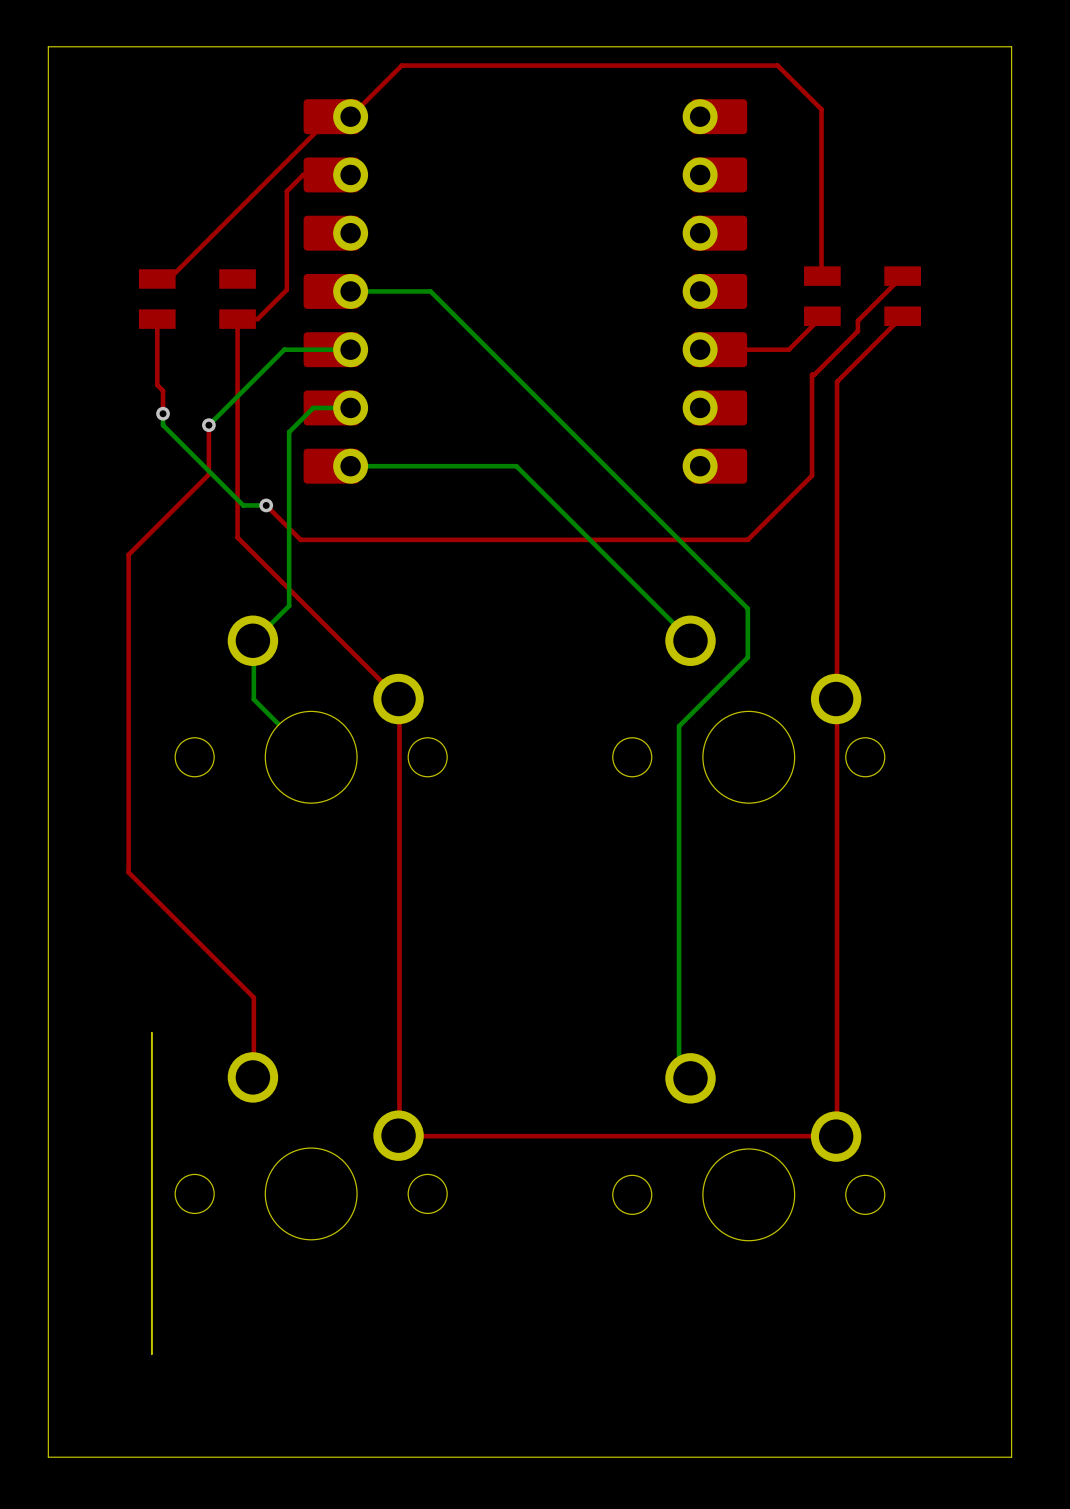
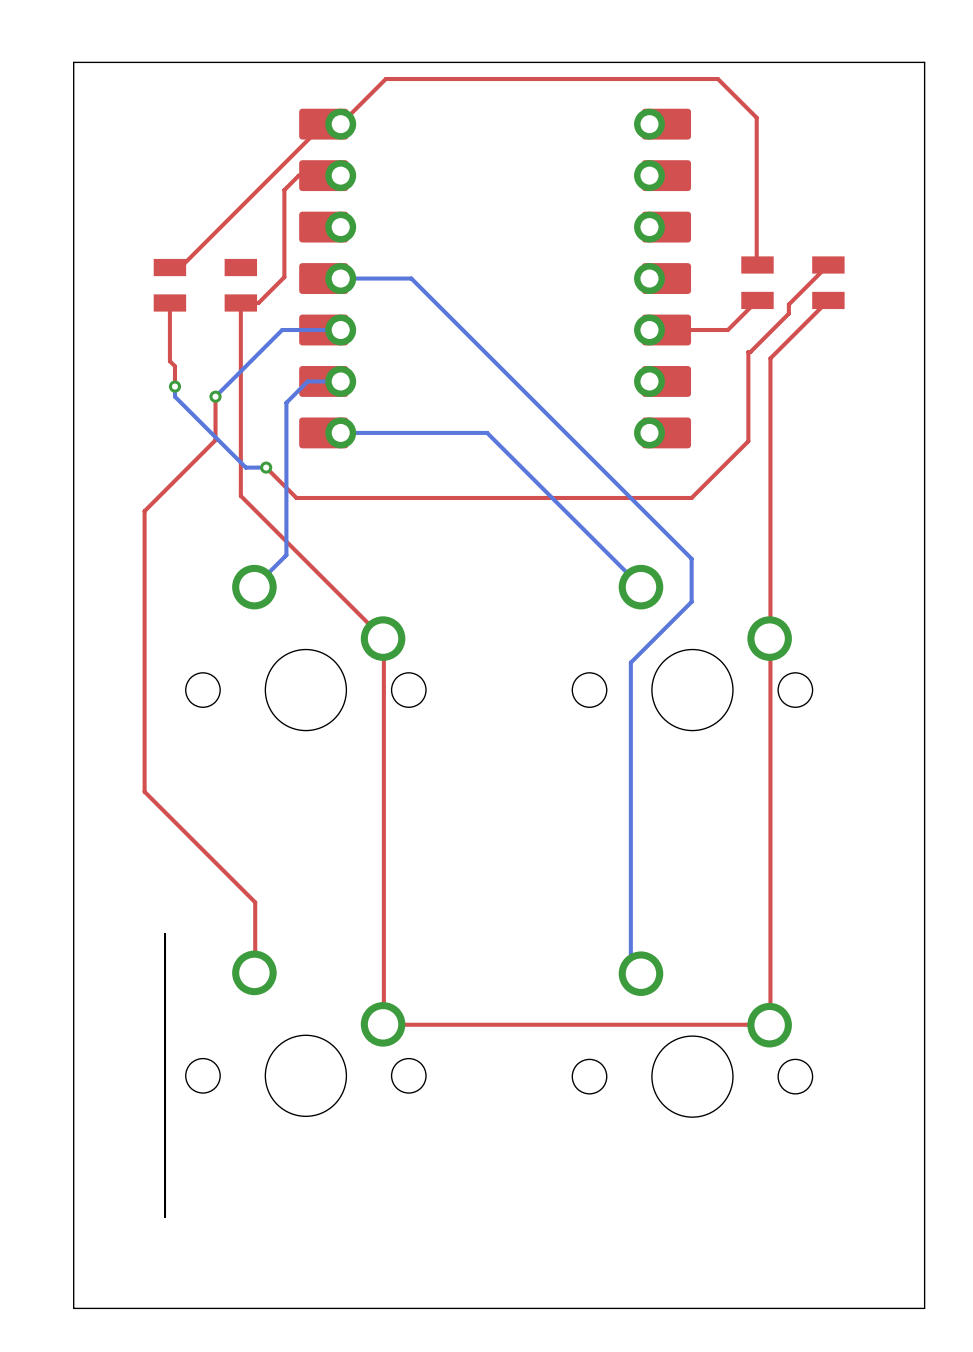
bottom track: (289, 604) (253, 641) (253, 699) (312, 757) -> (286, 555) (254, 587)

